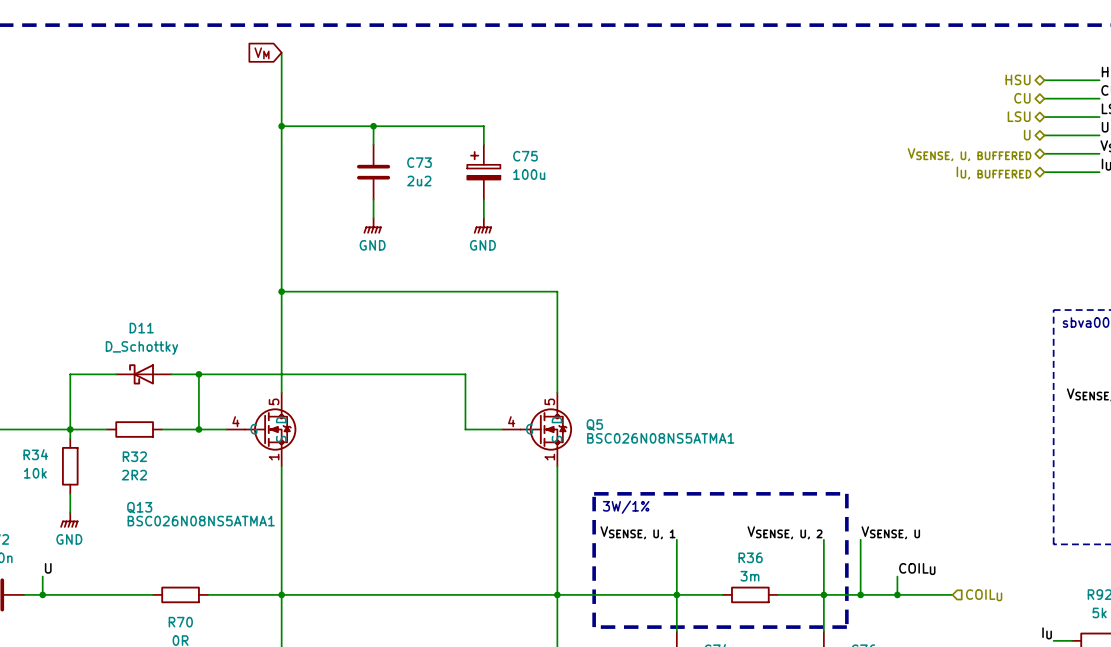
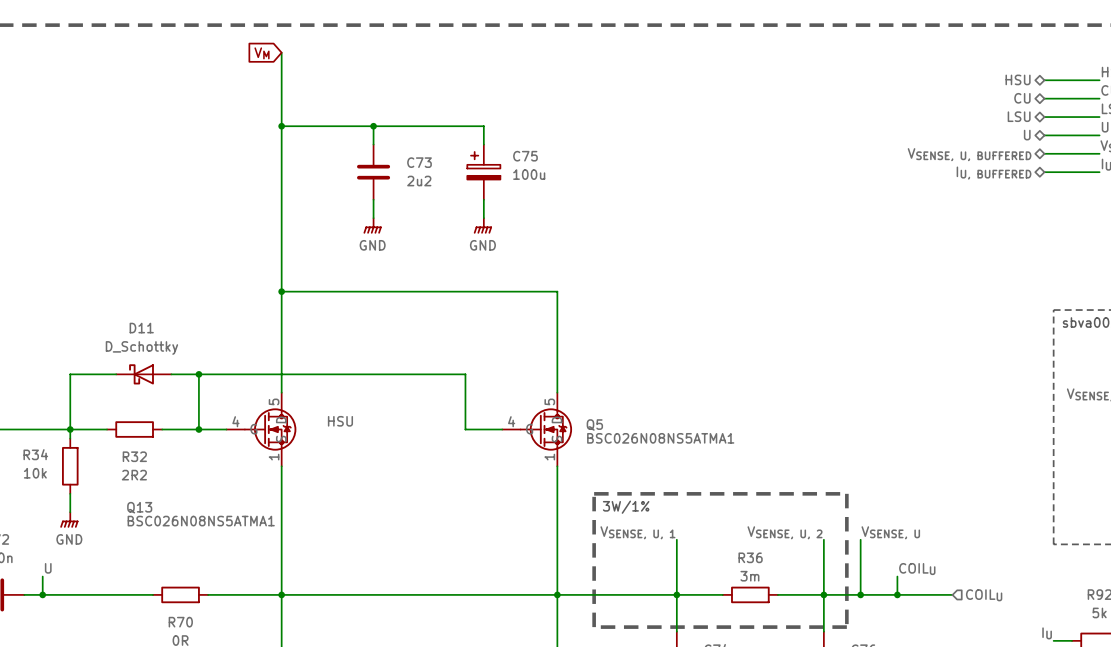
label: none -> HSU (340, 421)

